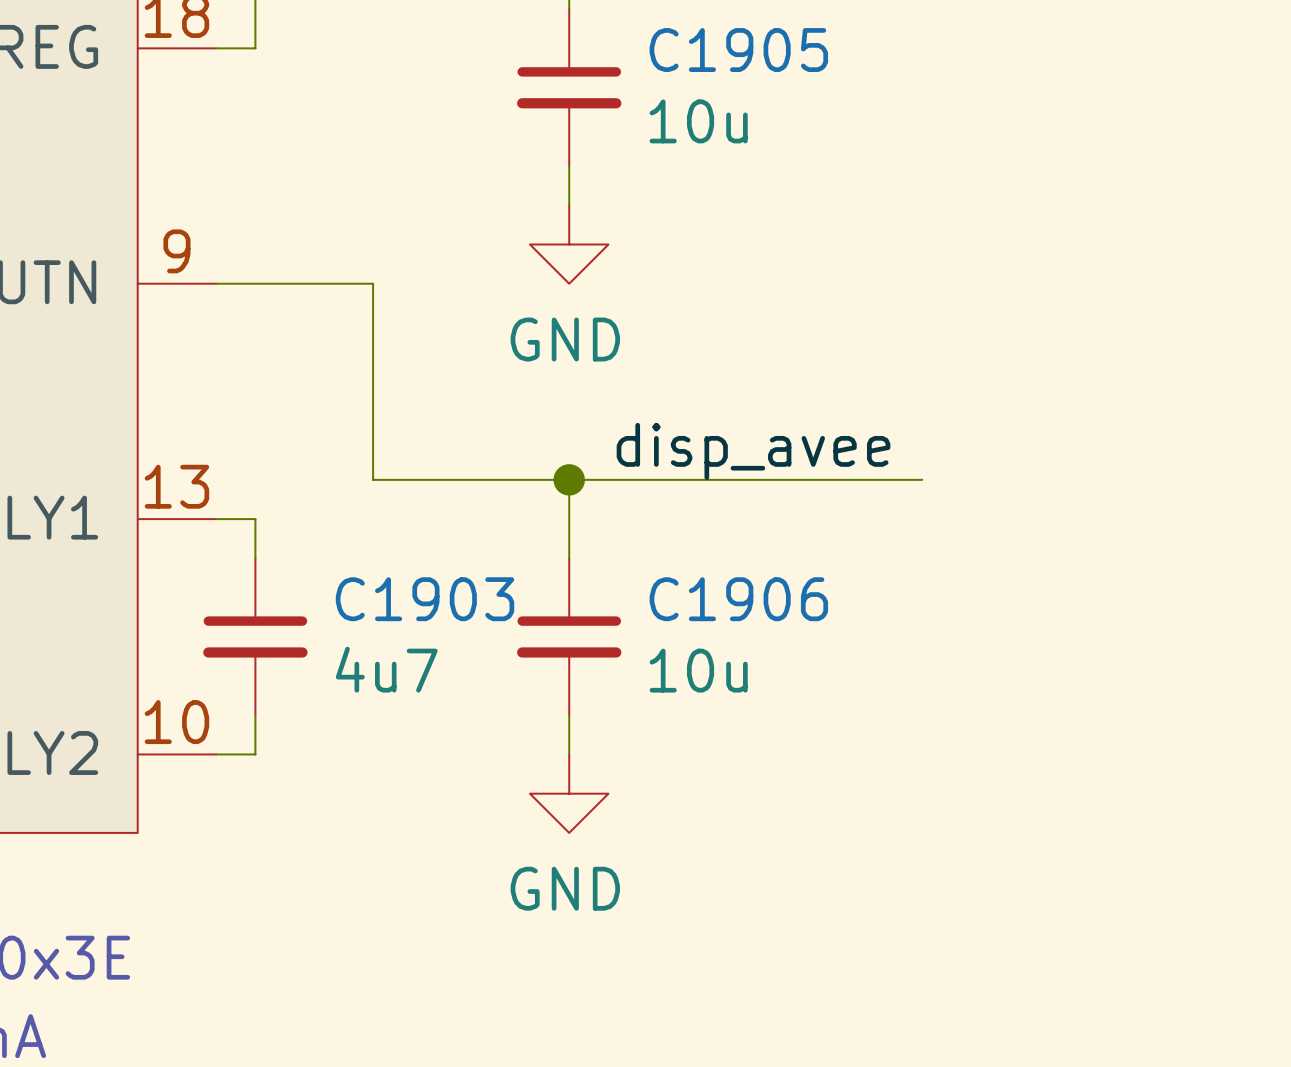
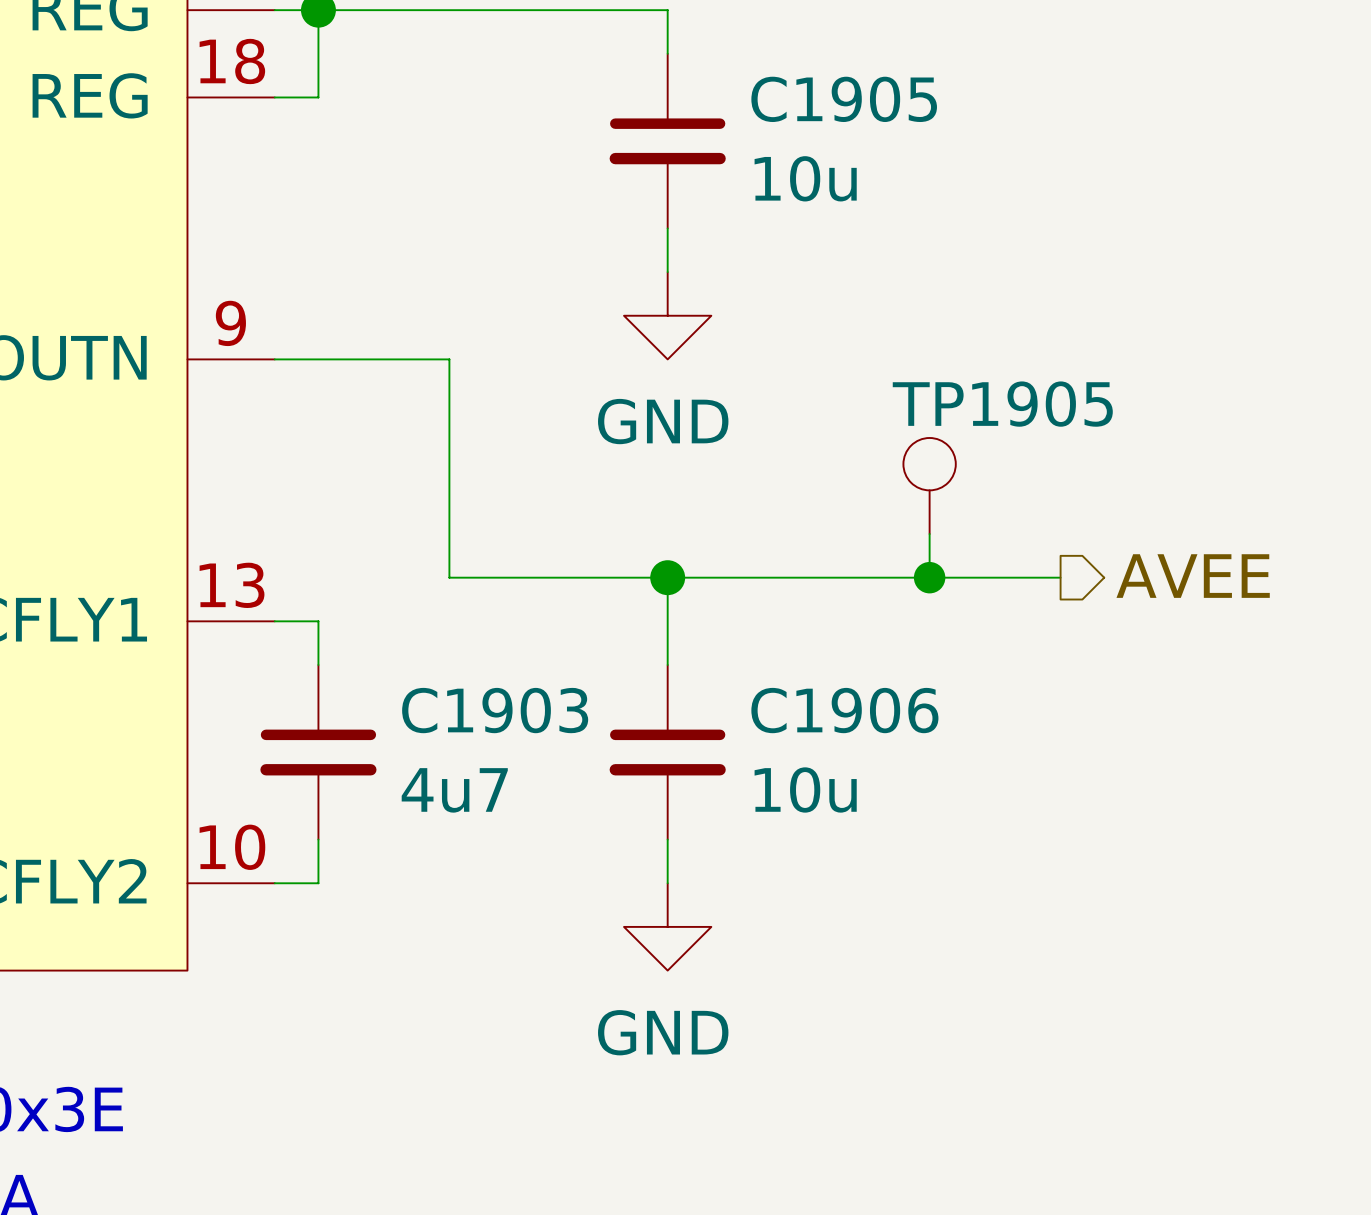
TP1905: none -> (929, 486)
wire: none -> (929, 534) (929, 577)
label: disp_avee (753, 451) -> none
hierarchical label: none -> AVEE (1193, 576)
junction: none -> (929, 577)

